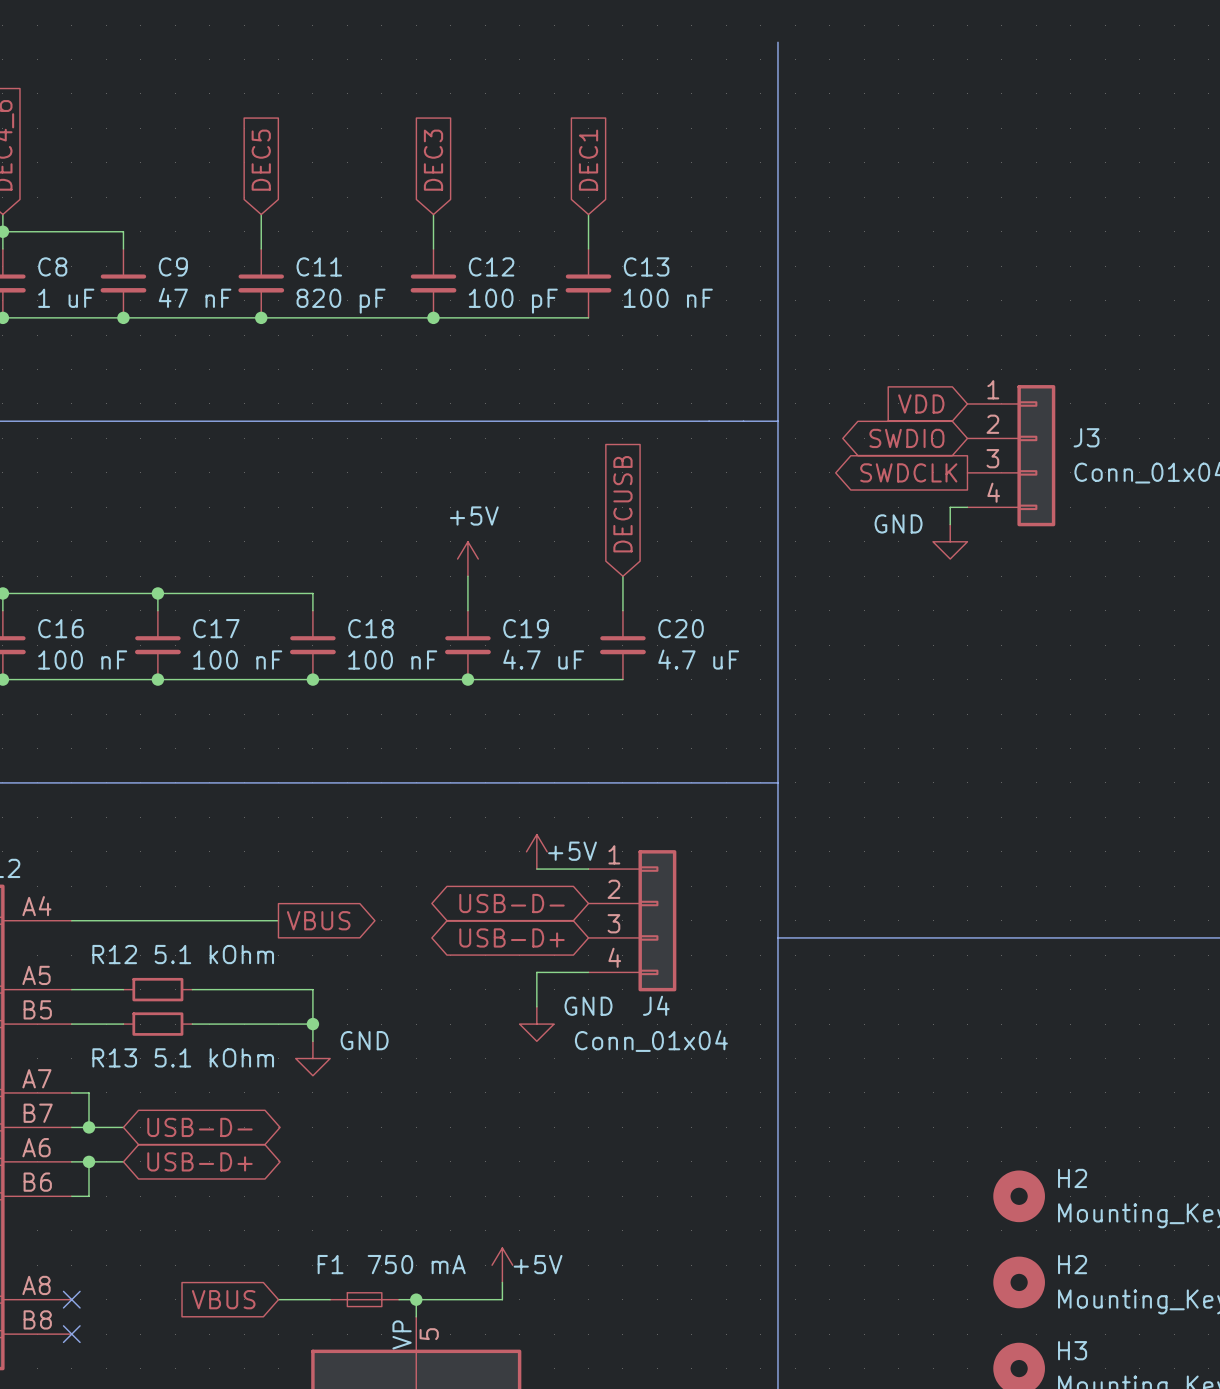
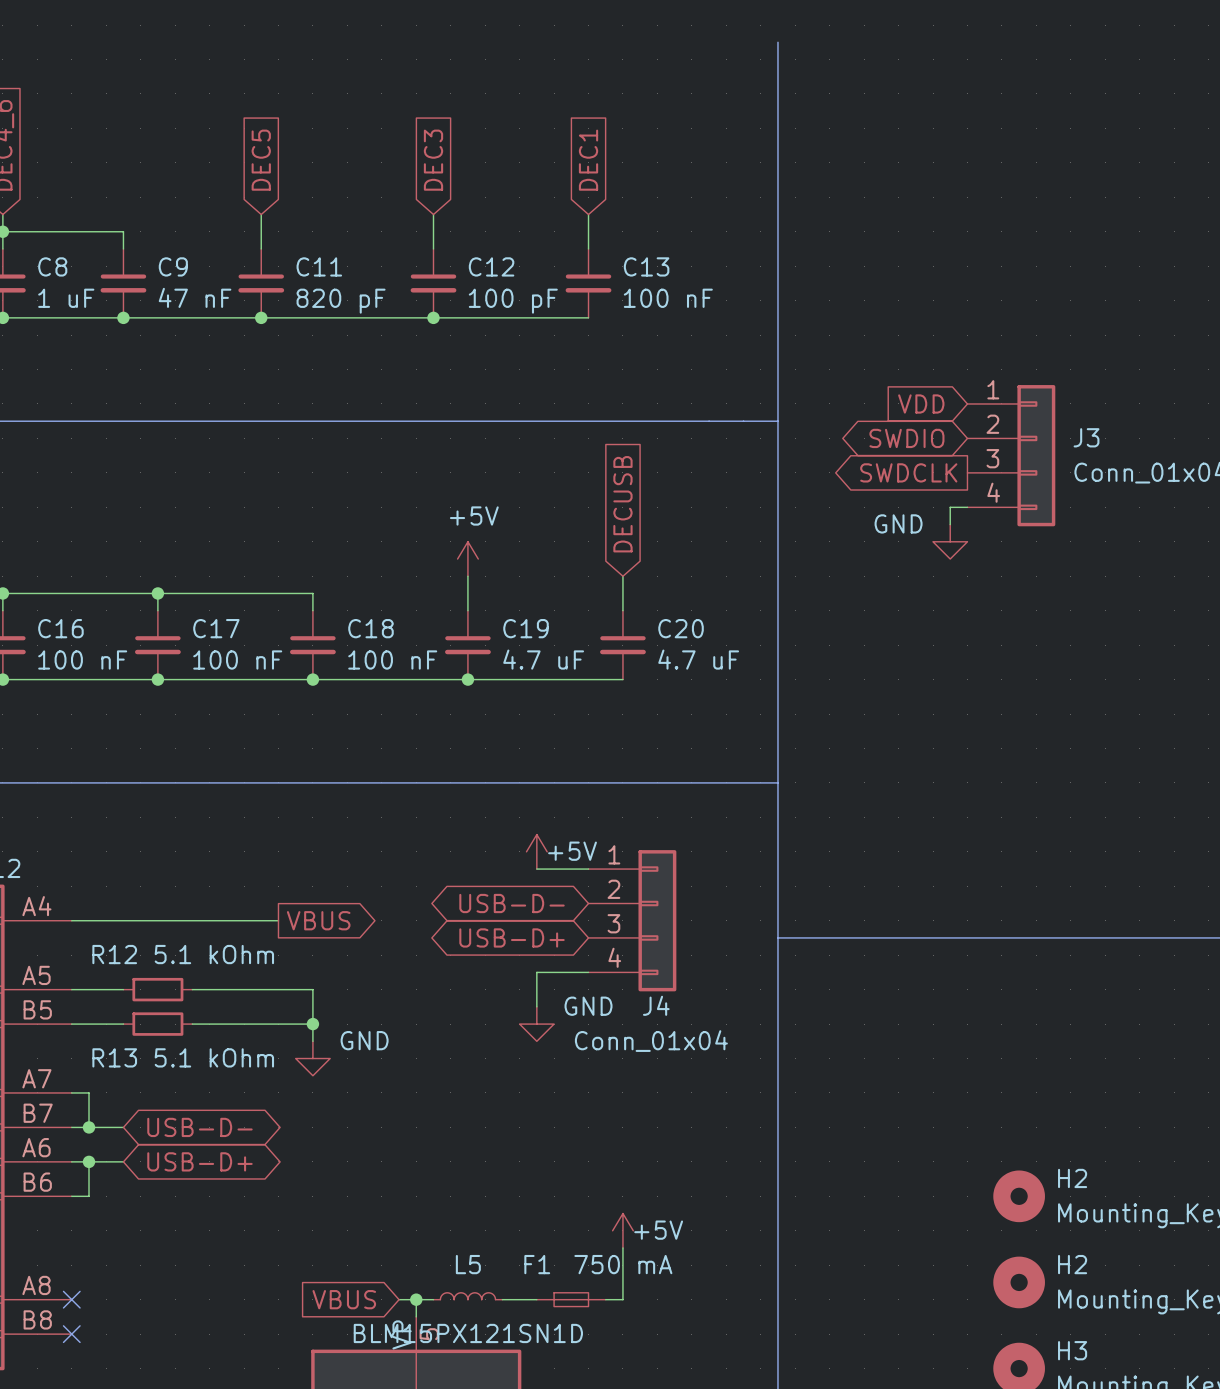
wire: none -> (622, 1248) (622, 1299) (605, 1299)
power symbol position: +5V (502, 1265) -> +5V (622, 1230)
wire: (502, 1282) (502, 1299) (433, 1299) -> none
L5: none -> BLM15PX121SN1D (467, 1296)
global label position: VBUS (223, 1299) -> VBUS (344, 1299)
wire: (278, 1299) (330, 1299) -> none
F1 position: (364, 1299) -> (571, 1299)
wire: none -> (502, 1299) (536, 1299)

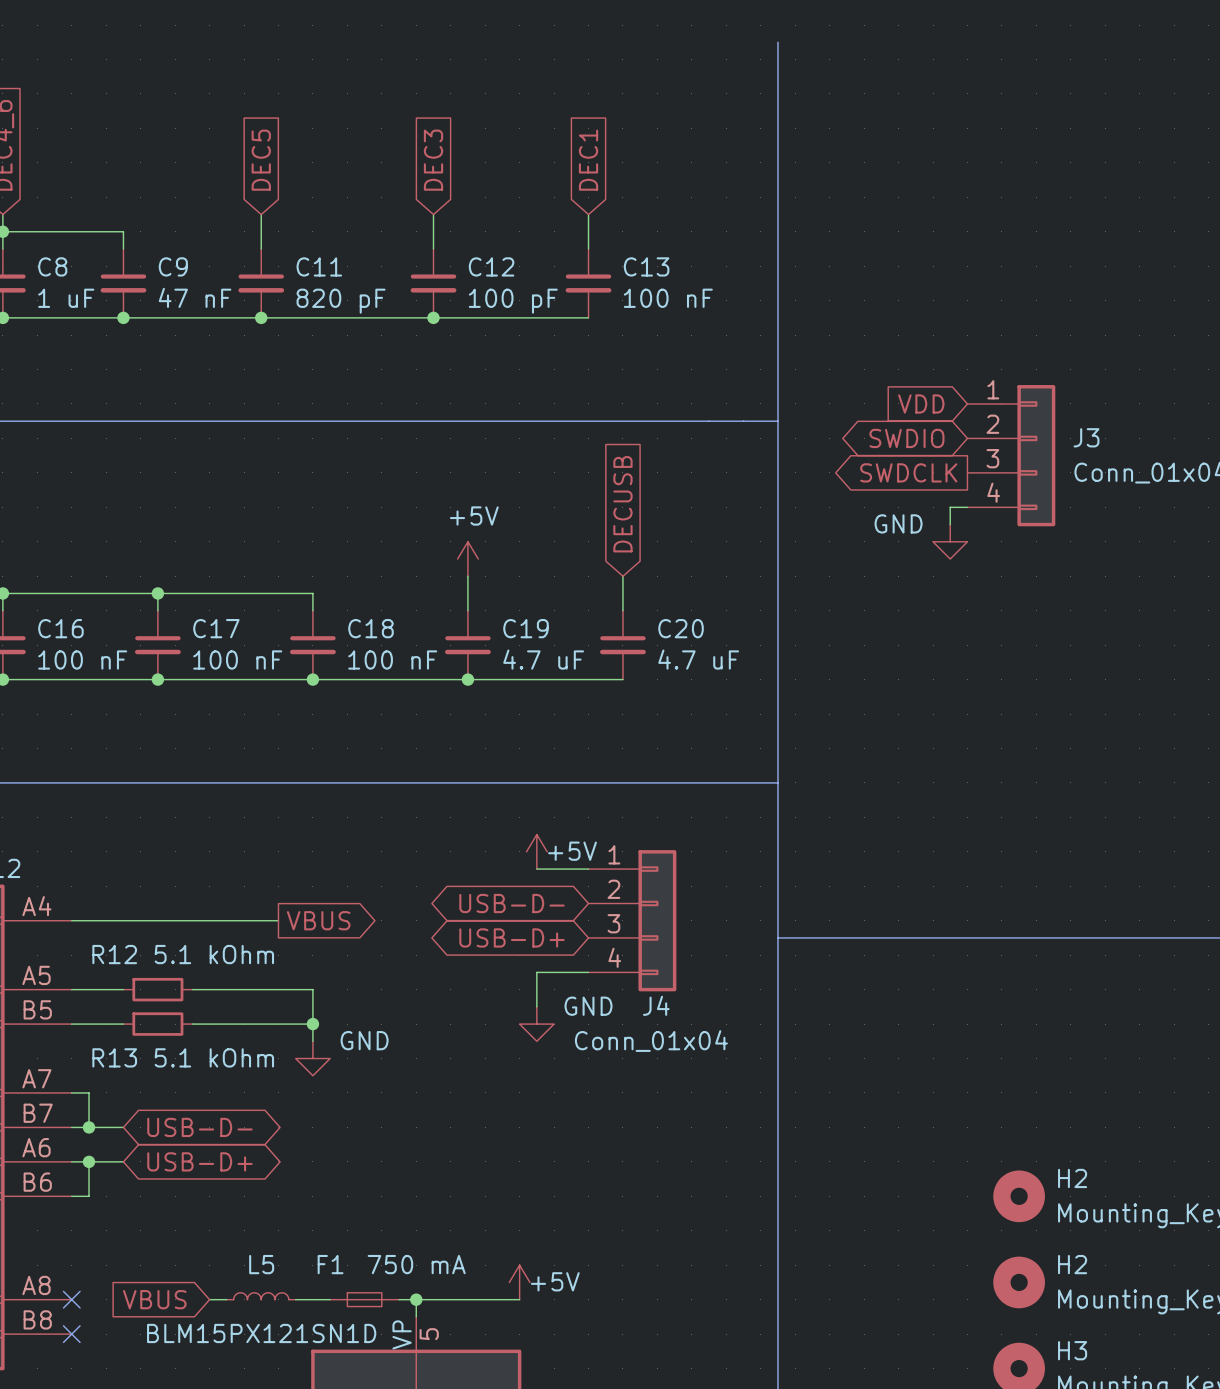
power symbol position: +5V (622, 1230) -> +5V (519, 1282)
wire: (622, 1248) (622, 1299) (605, 1299) -> none
L5 position: (467, 1296) -> (261, 1296)
wire: none -> (295, 1299) (330, 1299)
global label position: VBUS (344, 1299) -> VBUS (154, 1299)
wire: none -> (433, 1299) (502, 1299)
wire: (519, 1299) (536, 1299) -> (209, 1299) (226, 1299)
F1 position: (571, 1299) -> (364, 1299)

